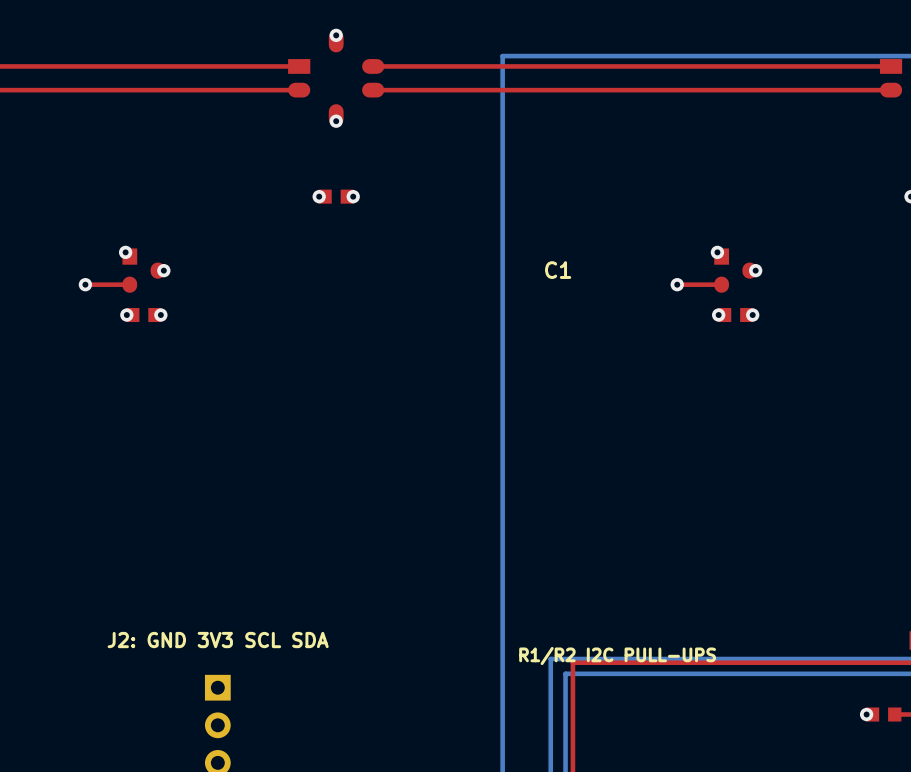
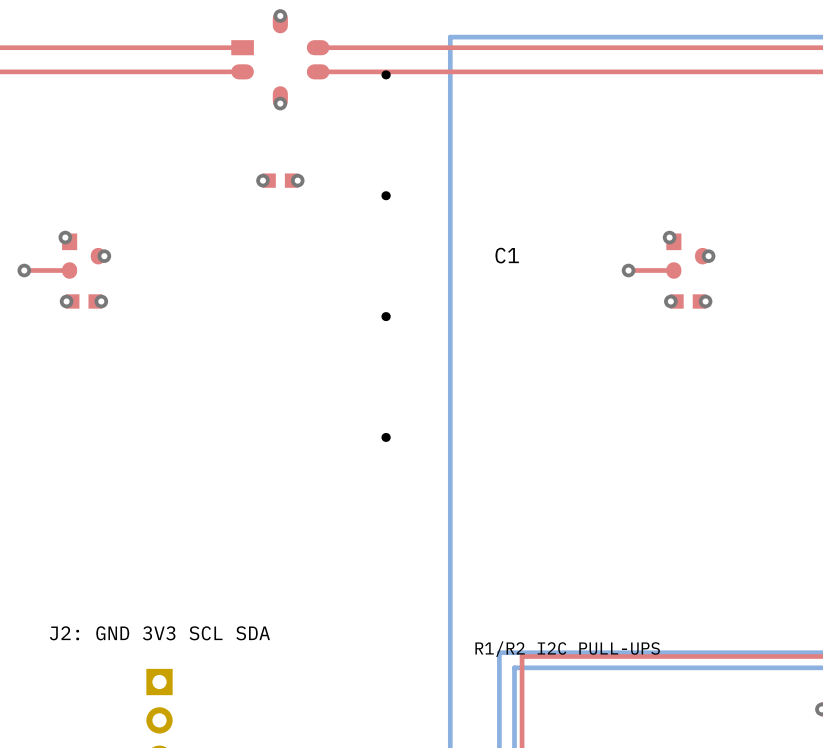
line: none -> (385, 74) (386, 74)
line: none -> (385, 195) (386, 195)
line: none -> (385, 316) (386, 316)
line: none -> (385, 437) (386, 437)

